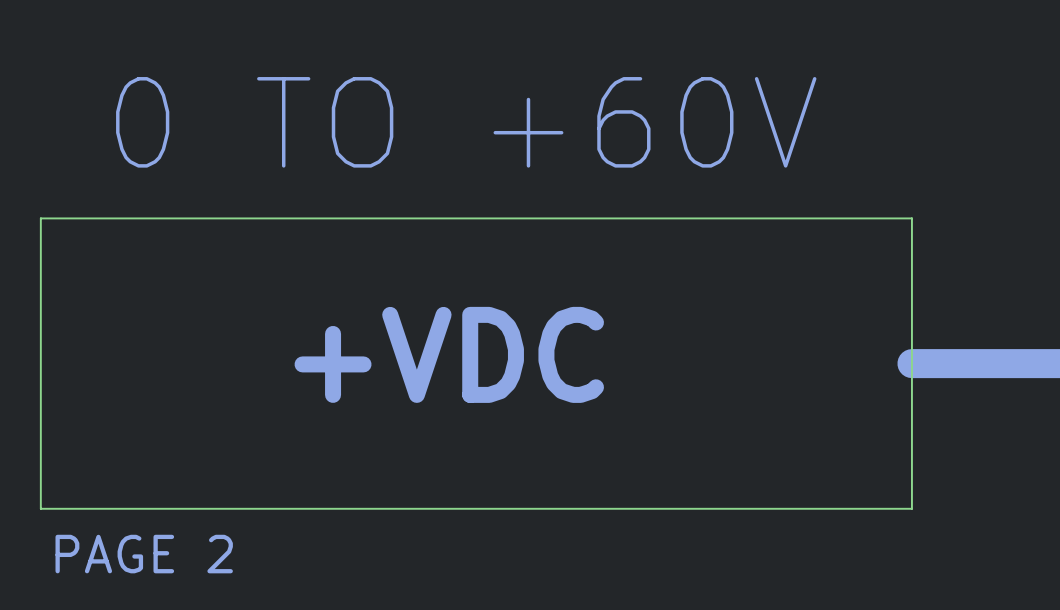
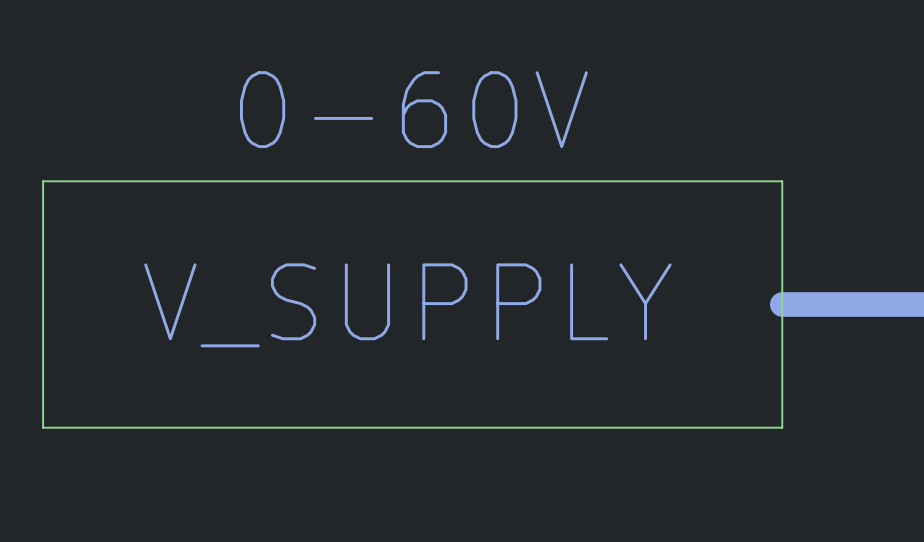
text: 0 TO +60V (466, 122) -> none
text: none -> 0-60V (413, 109)
text: +VDC (449, 354) -> none
text: none -> V_SUPPLY (407, 305)
text: PAGE 2 (144, 554) -> none

